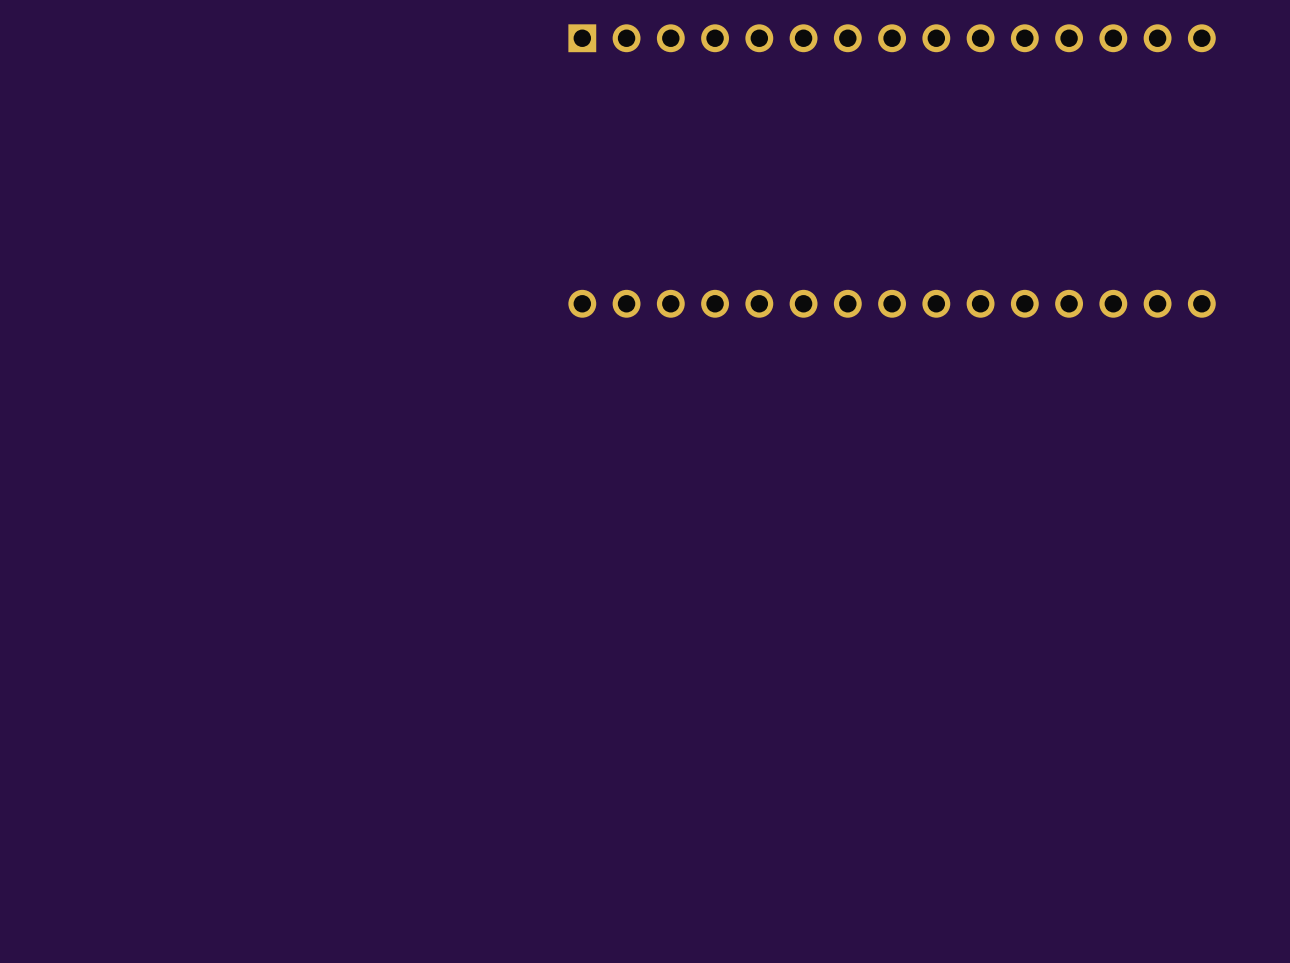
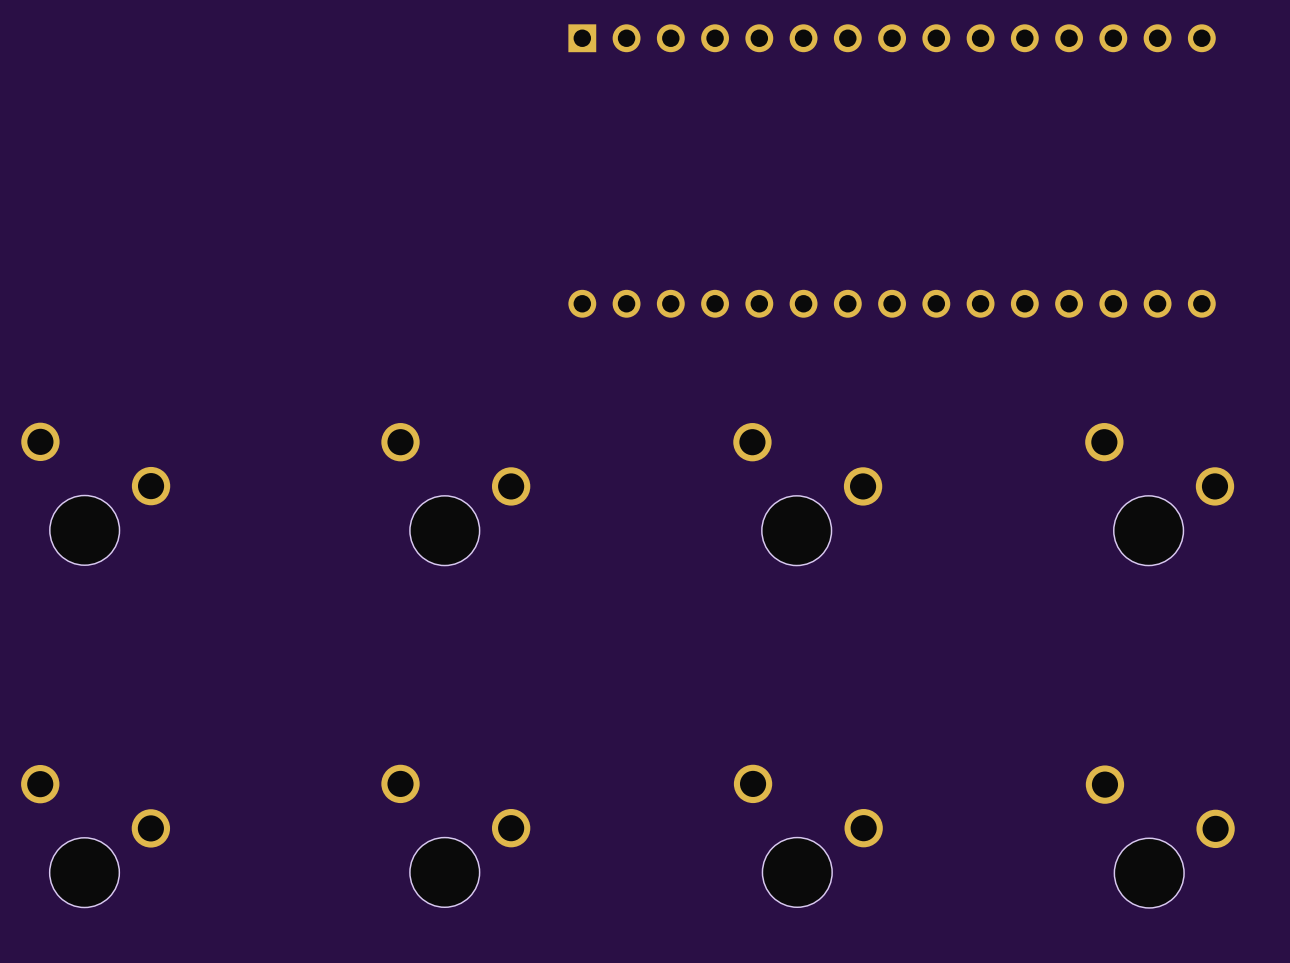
part: none -> (95, 493)
part: none -> (455, 494)
part: none -> (807, 494)
part: none -> (1159, 494)
part: none -> (95, 836)
part: none -> (455, 836)
part: none -> (808, 836)
part: none -> (1160, 836)

